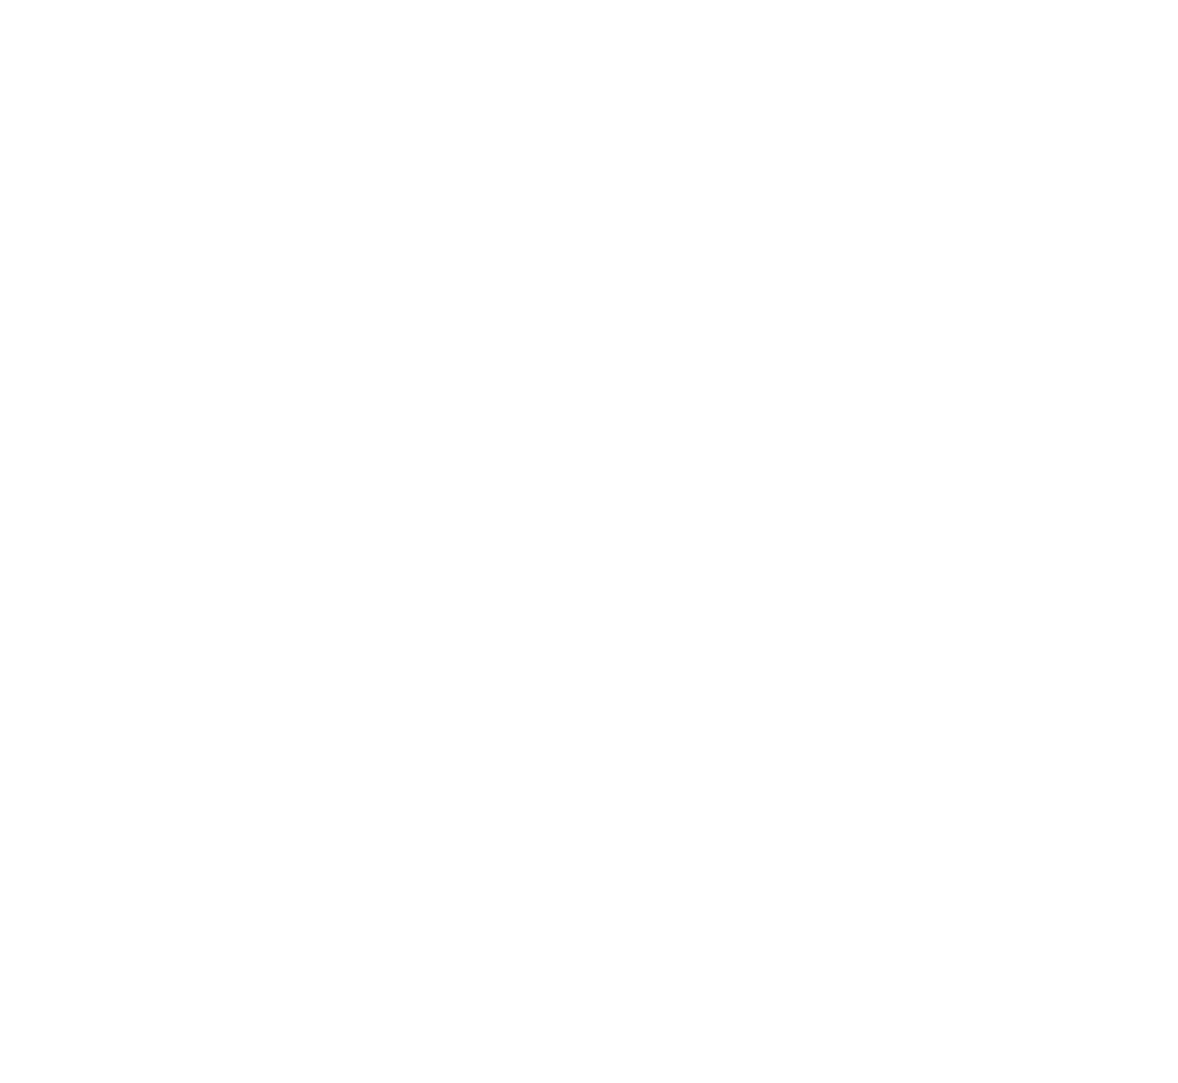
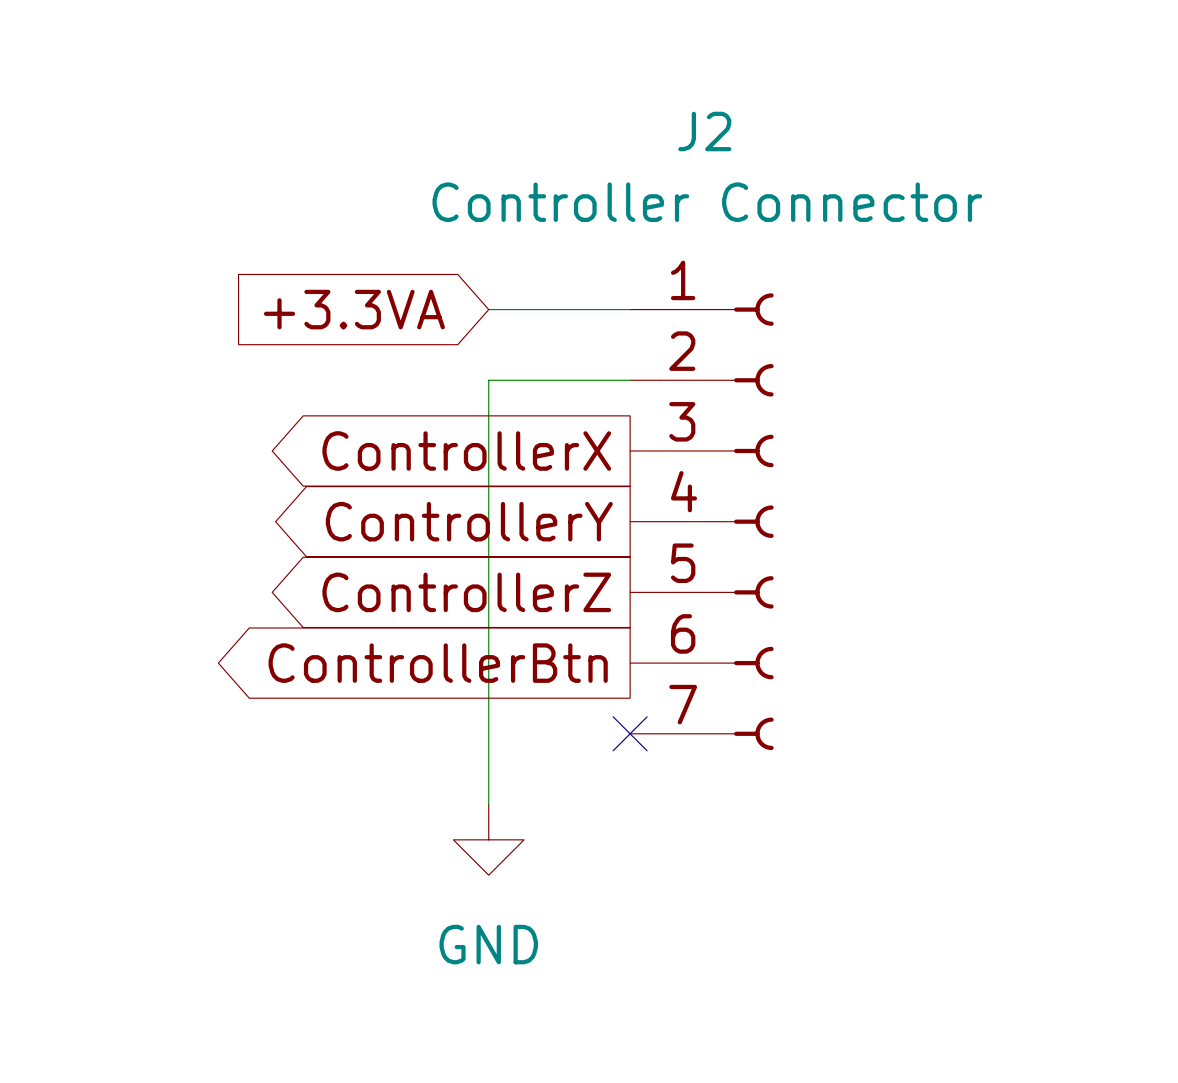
global label: none -> +3.3VA (354, 309)
wire: none -> (488, 309) (630, 309)
wire: none -> (630, 380) (488, 380) (488, 804)
global label: none -> ControllerX (466, 450)
global label: none -> ControllerY (469, 521)
J2: none -> Controller Connector (701, 521)
global label: none -> ControllerZ (466, 592)
global label: none -> ControllerBtn (438, 663)
no-connect mark: none -> (630, 733)
power symbol: none -> GND (488, 839)

